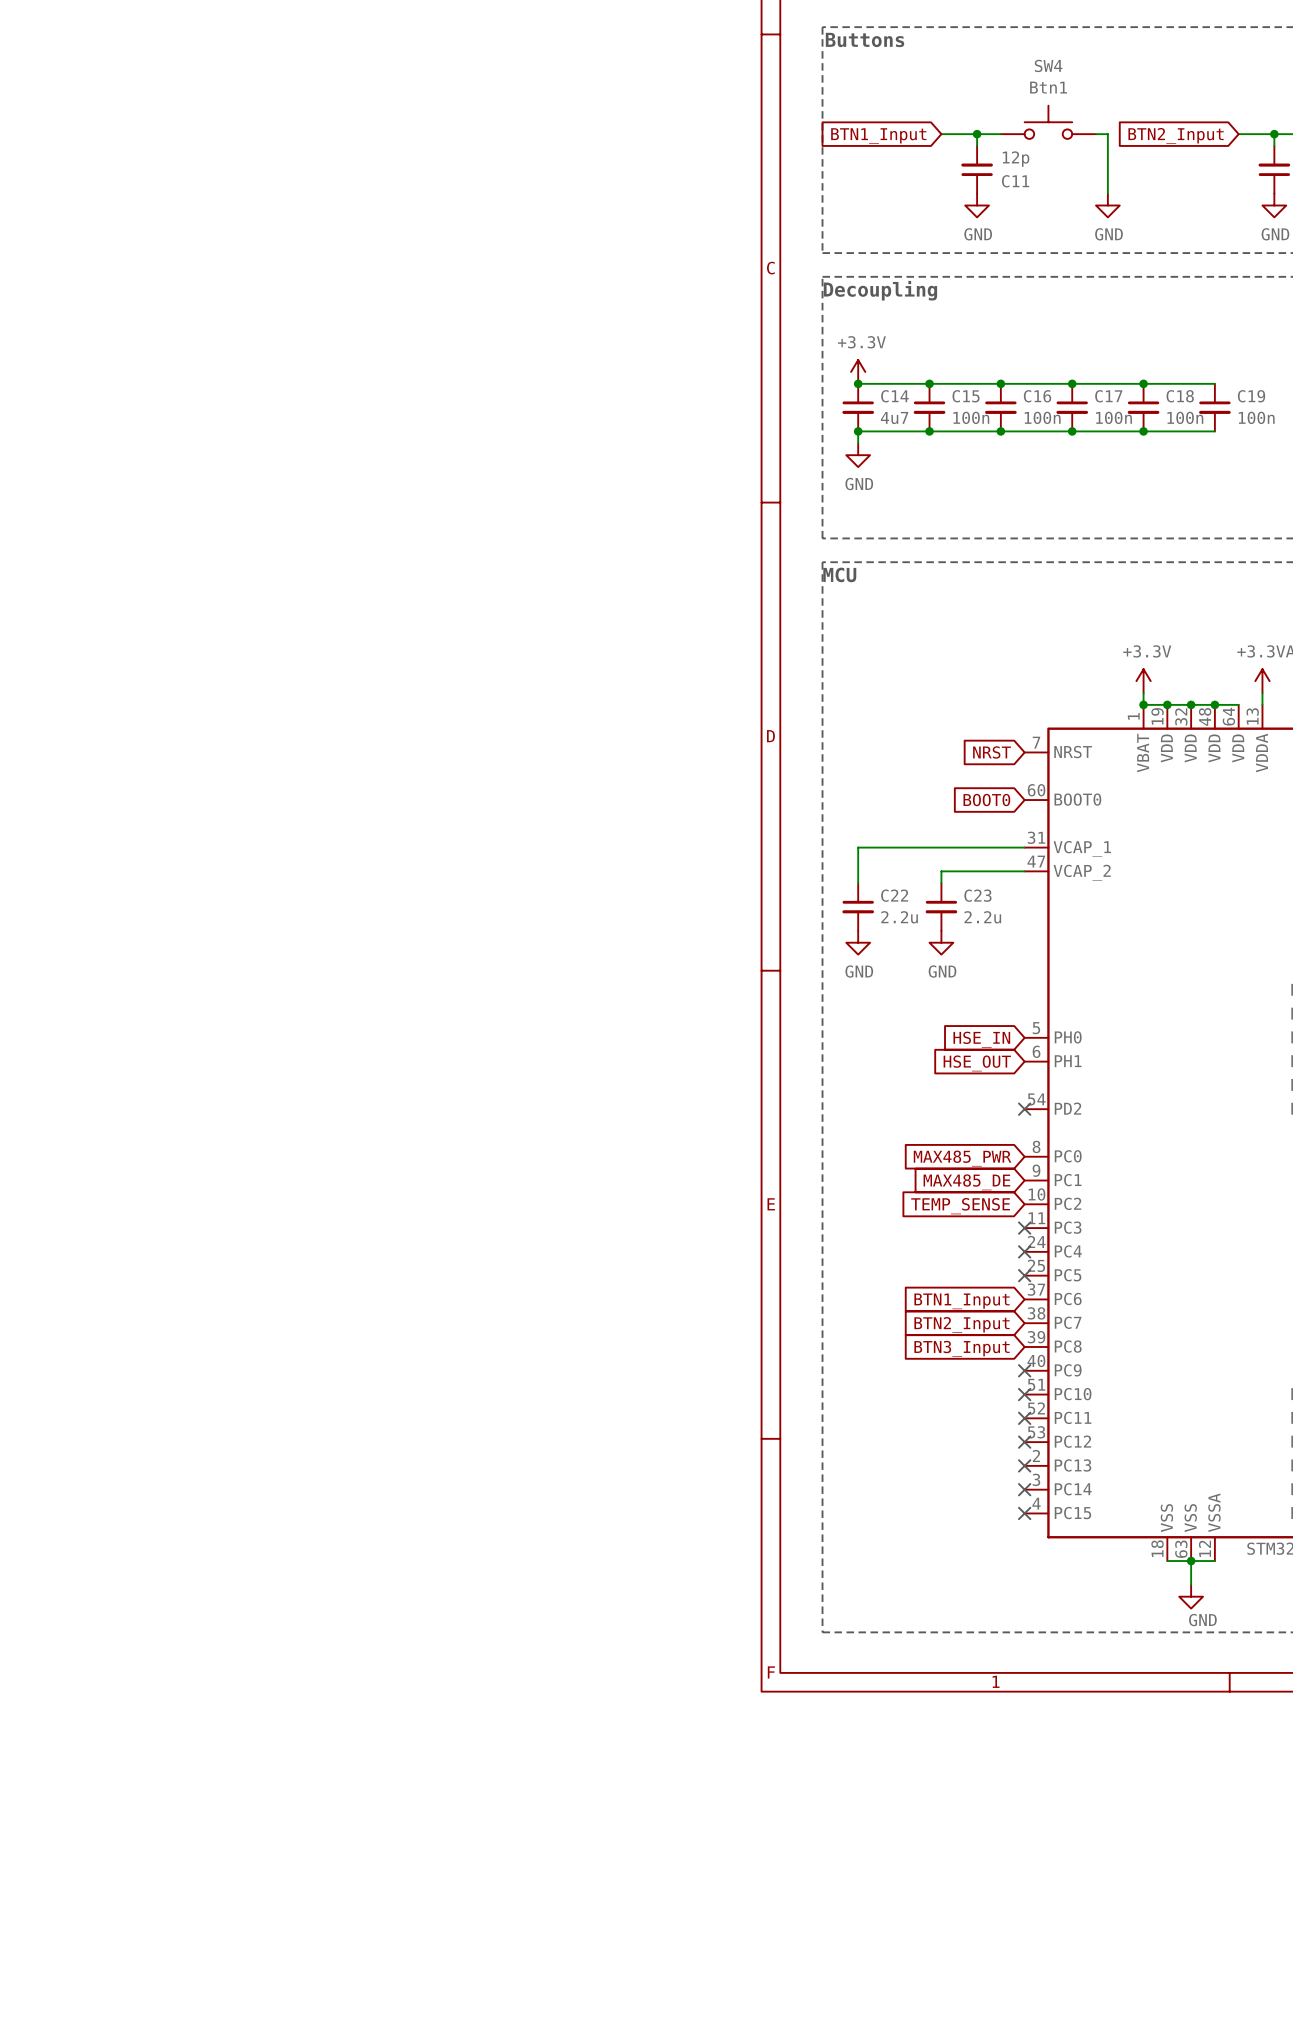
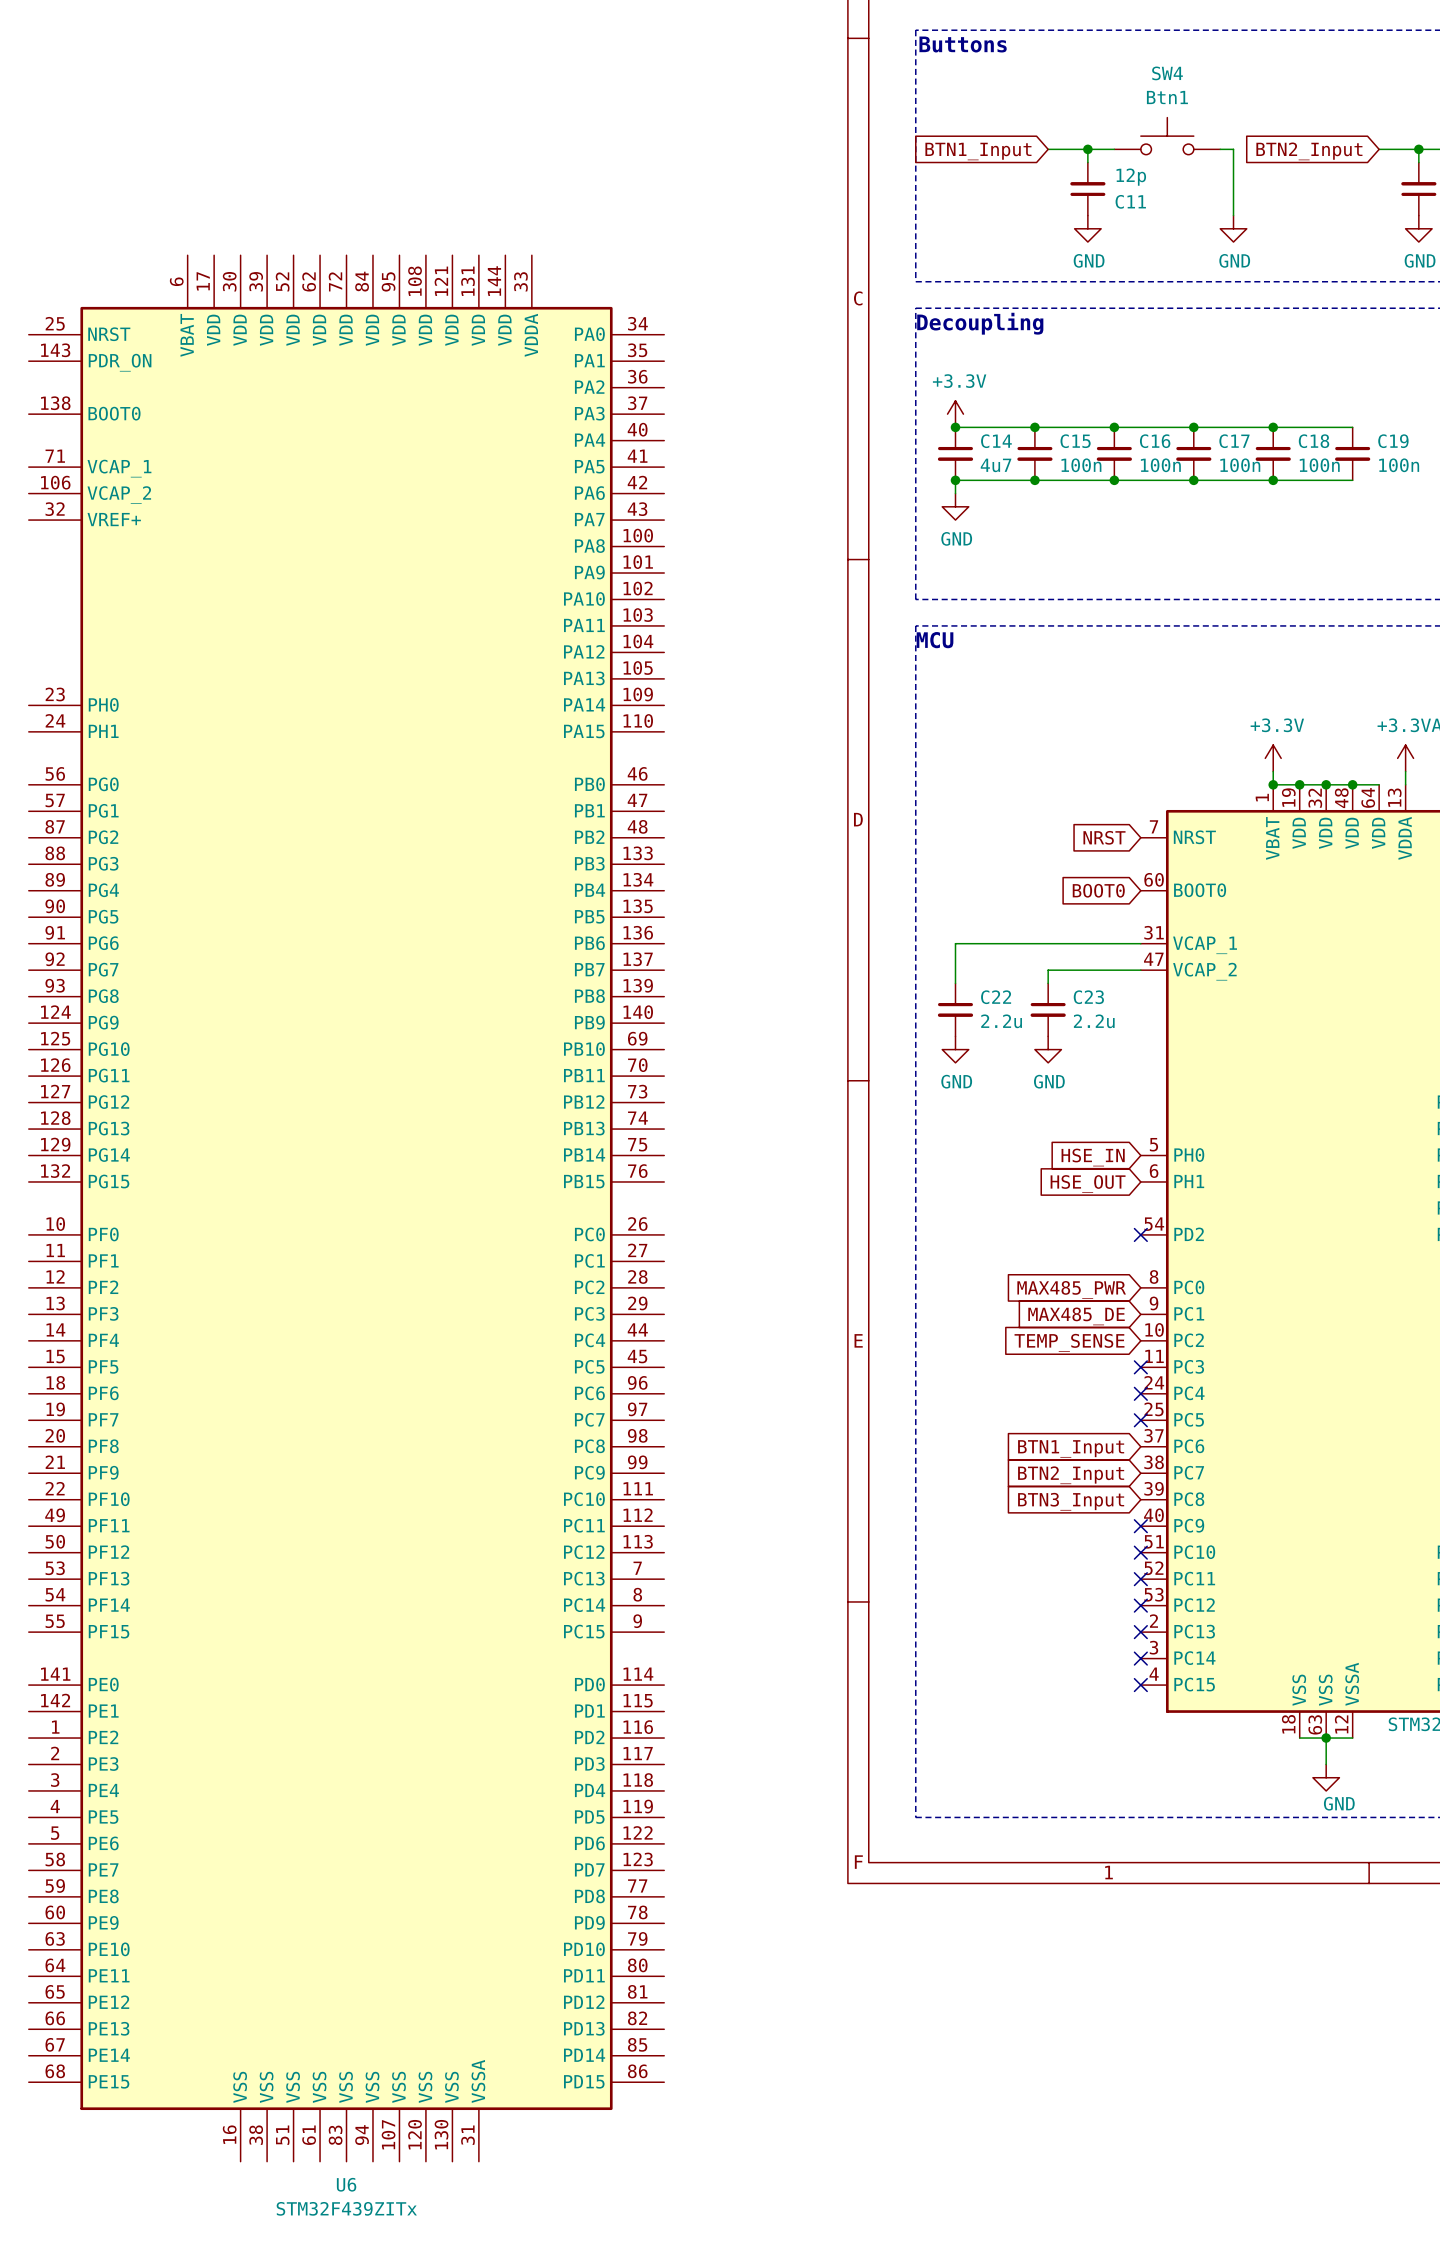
U6: none -> STM32F439ZITx (346, 1208)

